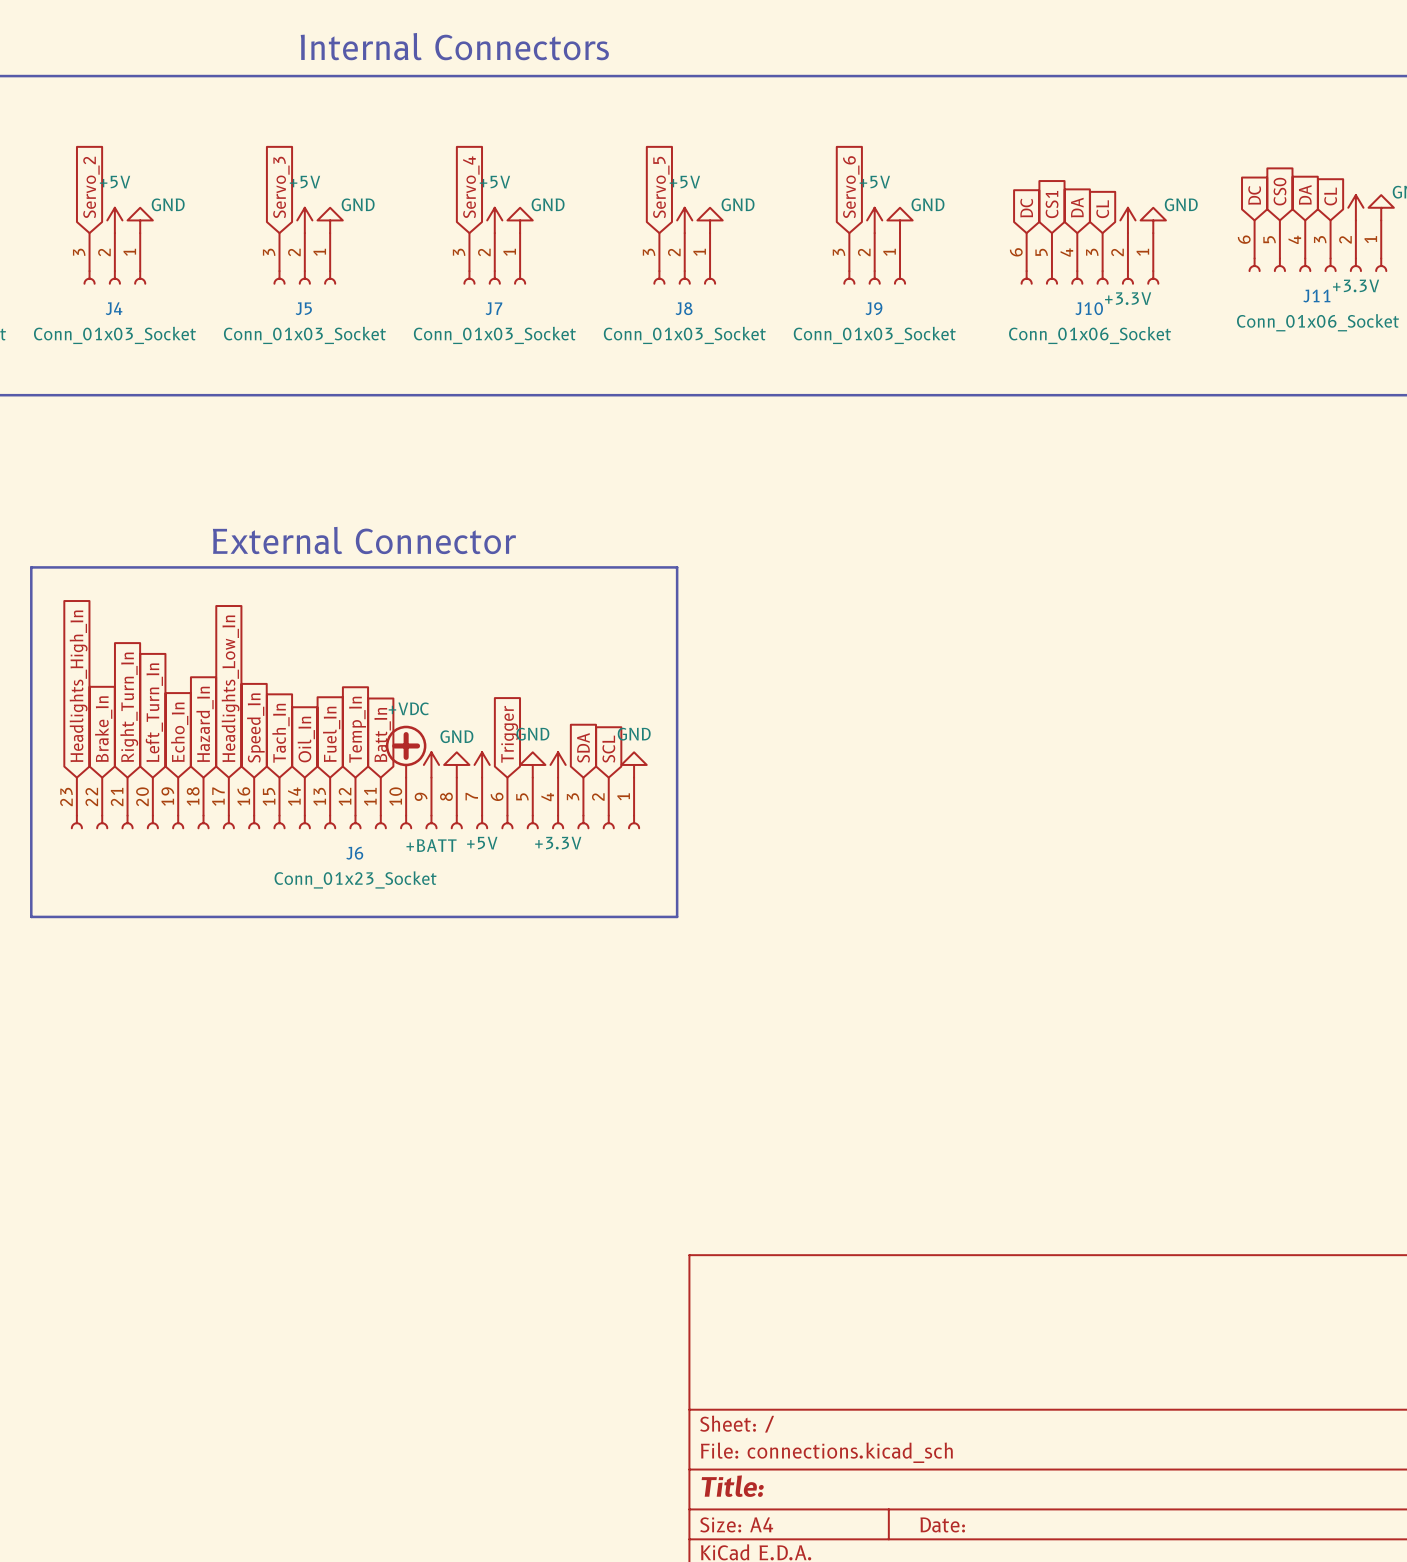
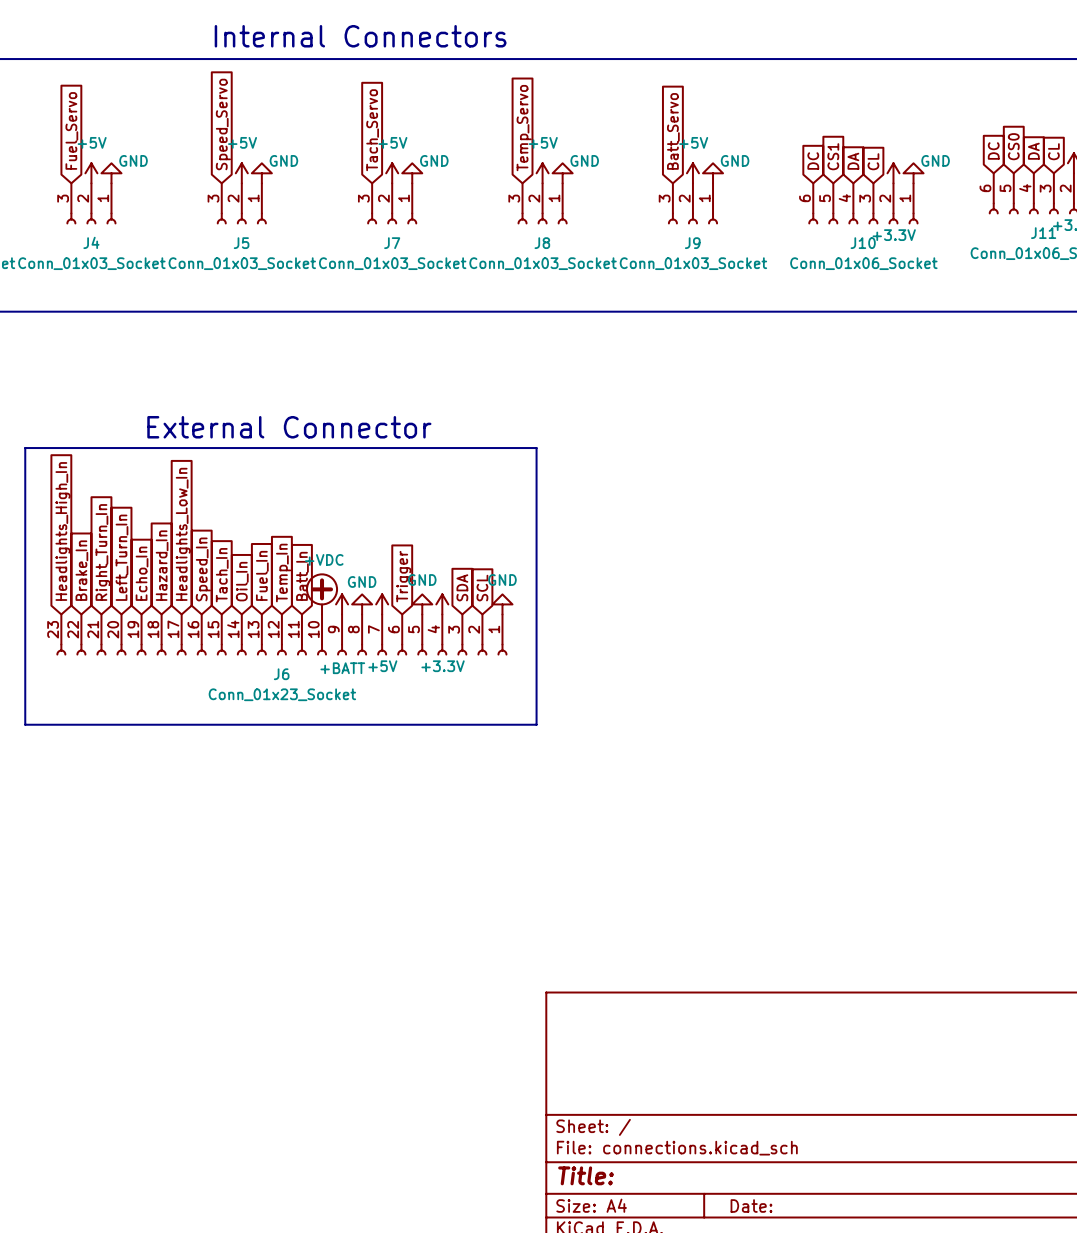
global label: Servo_2 (91, 187) -> Fuel_Servo (71, 130)
global label: Servo_3 (281, 187) -> Speed_Servo (223, 124)
global label: Servo_4 (471, 187) -> Tach_Servo (372, 130)
global label: Servo_5 (661, 187) -> Temp_Servo (524, 128)
global label: Servo_6 (851, 187) -> Batt_Servo (673, 131)

